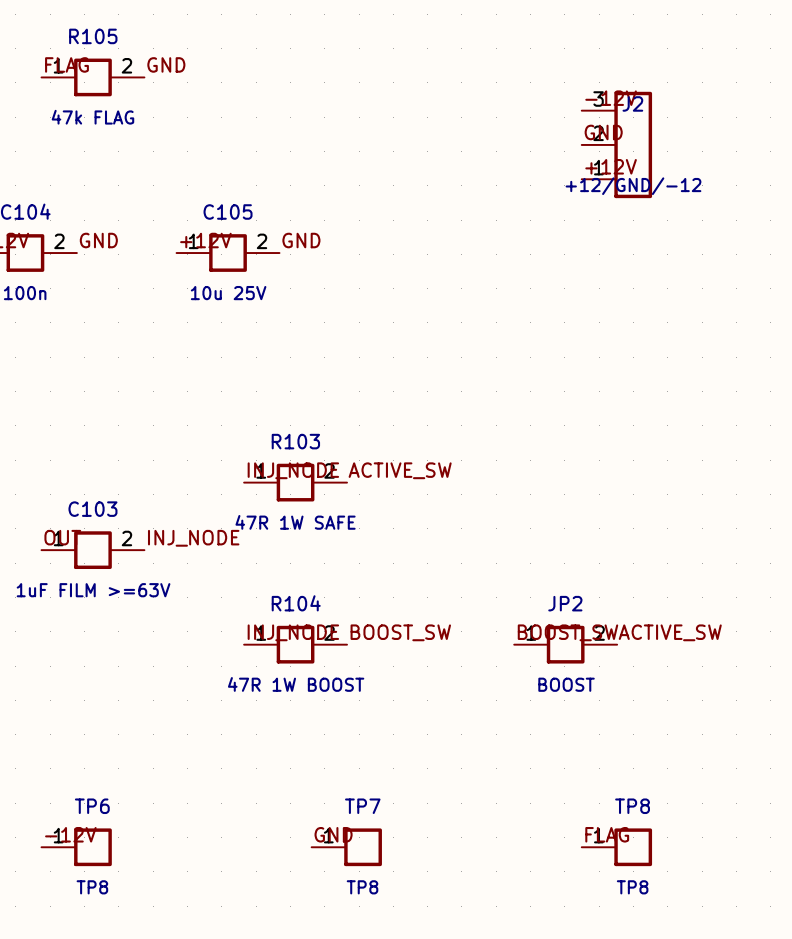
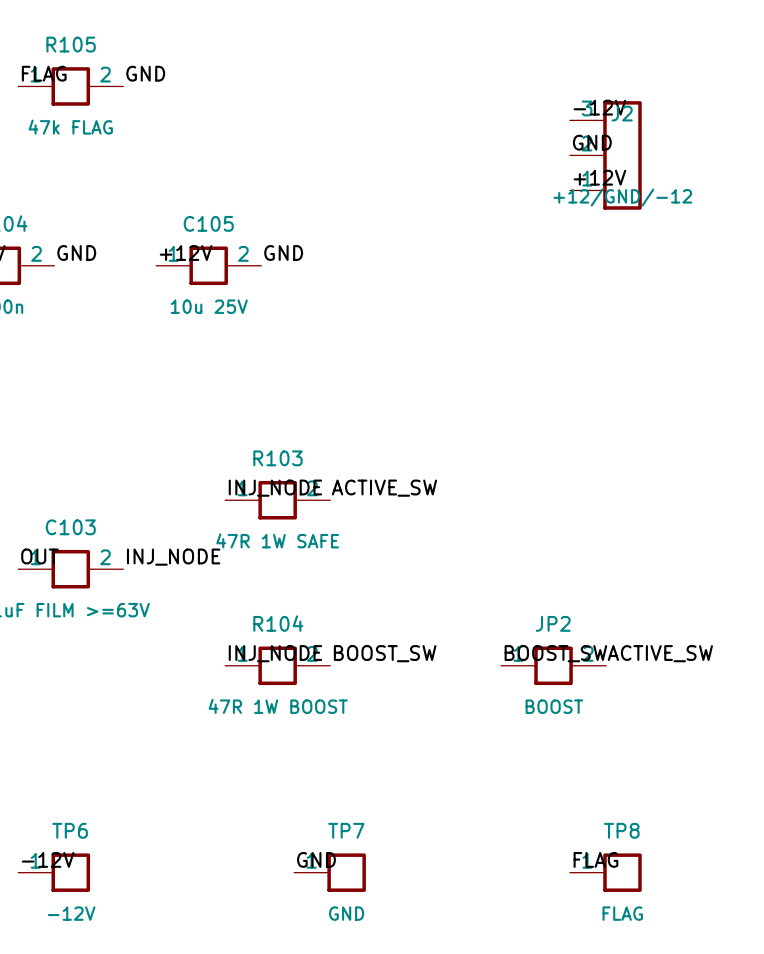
TP6 value: TP8 (92, 887) -> -12V (71, 913)
TP7 value: TP8 (362, 887) -> GND (346, 913)
TP8 value: TP8 (632, 887) -> FLAG (622, 913)

